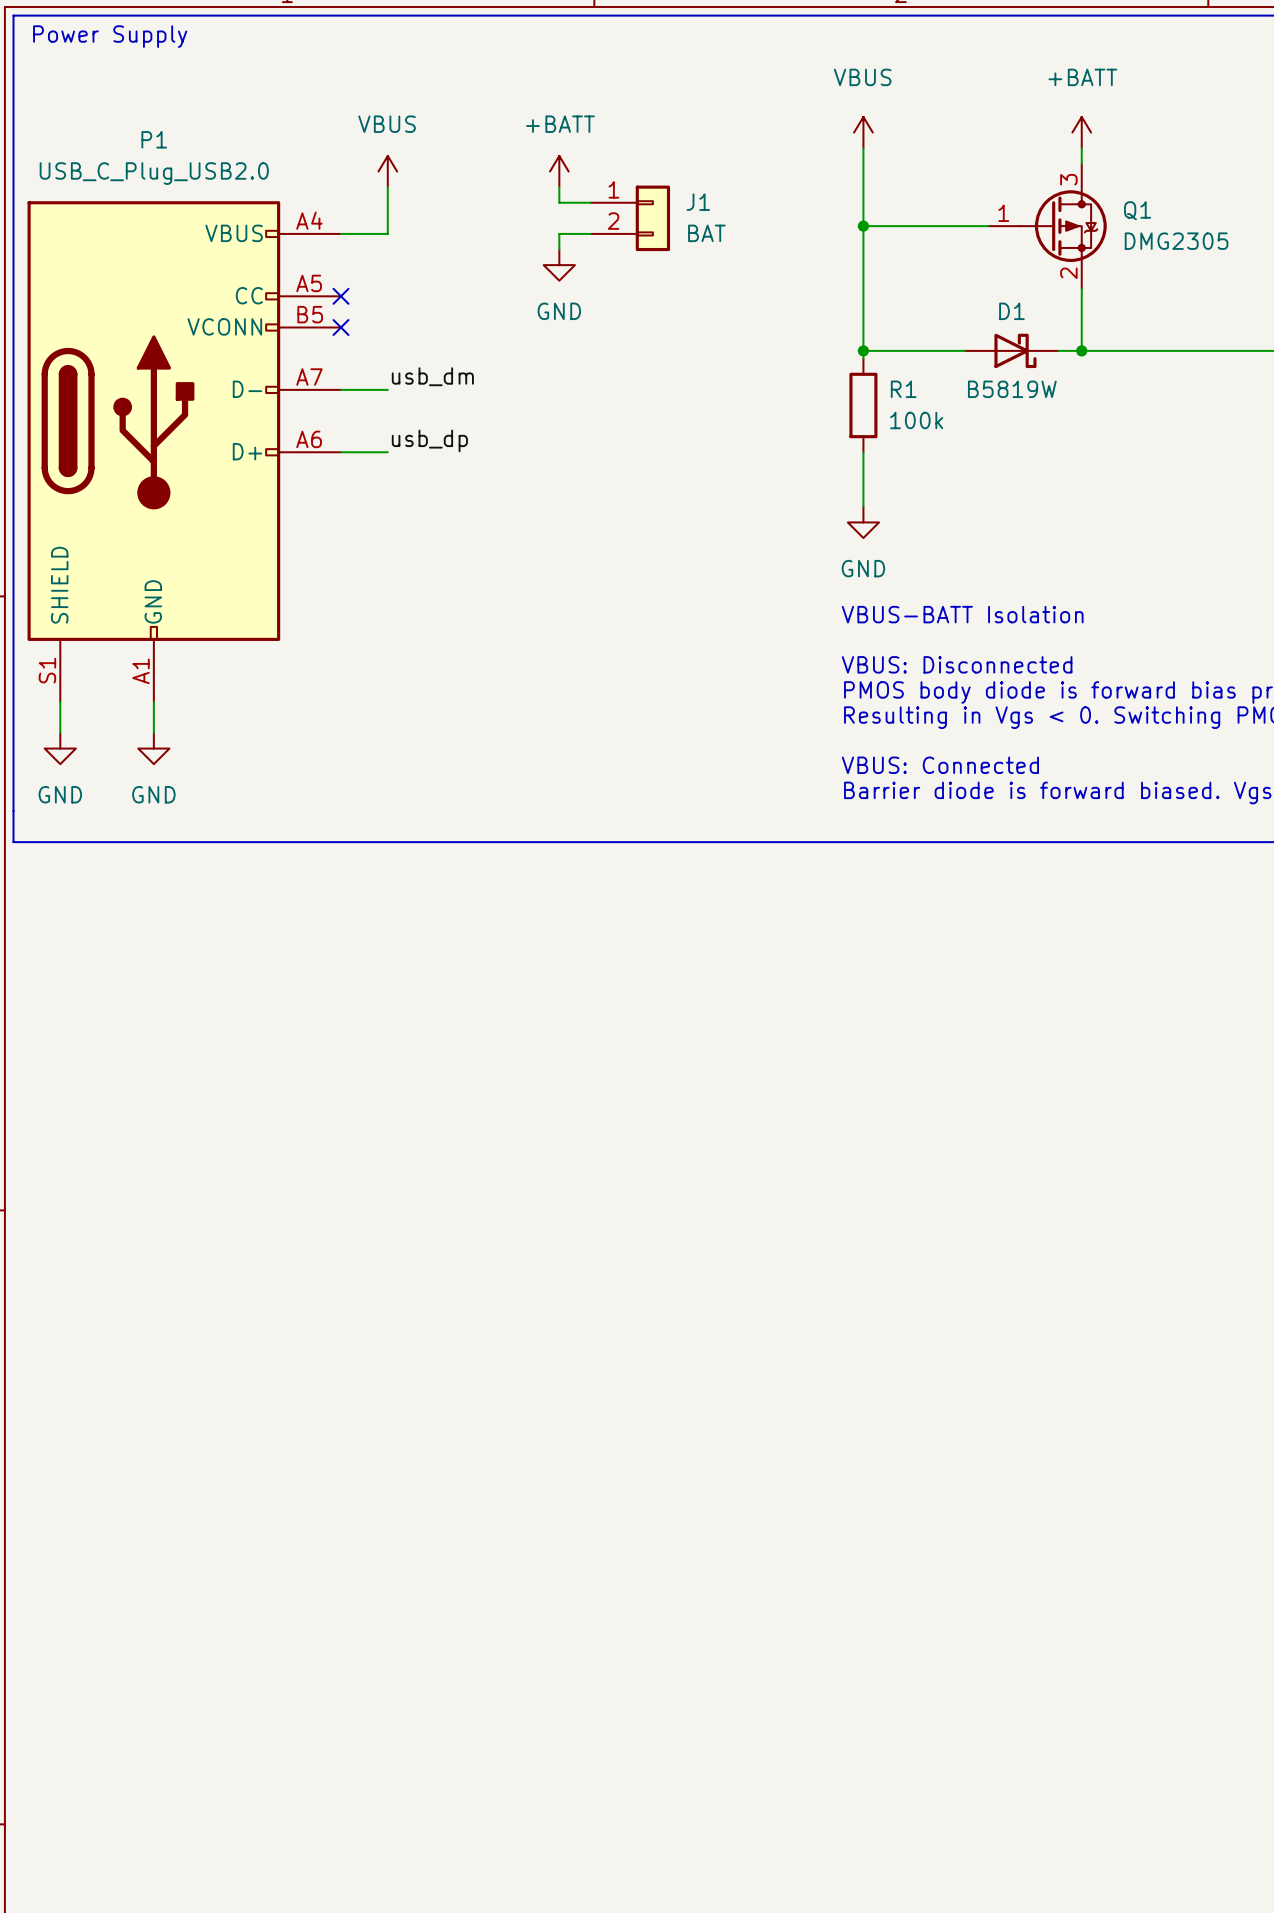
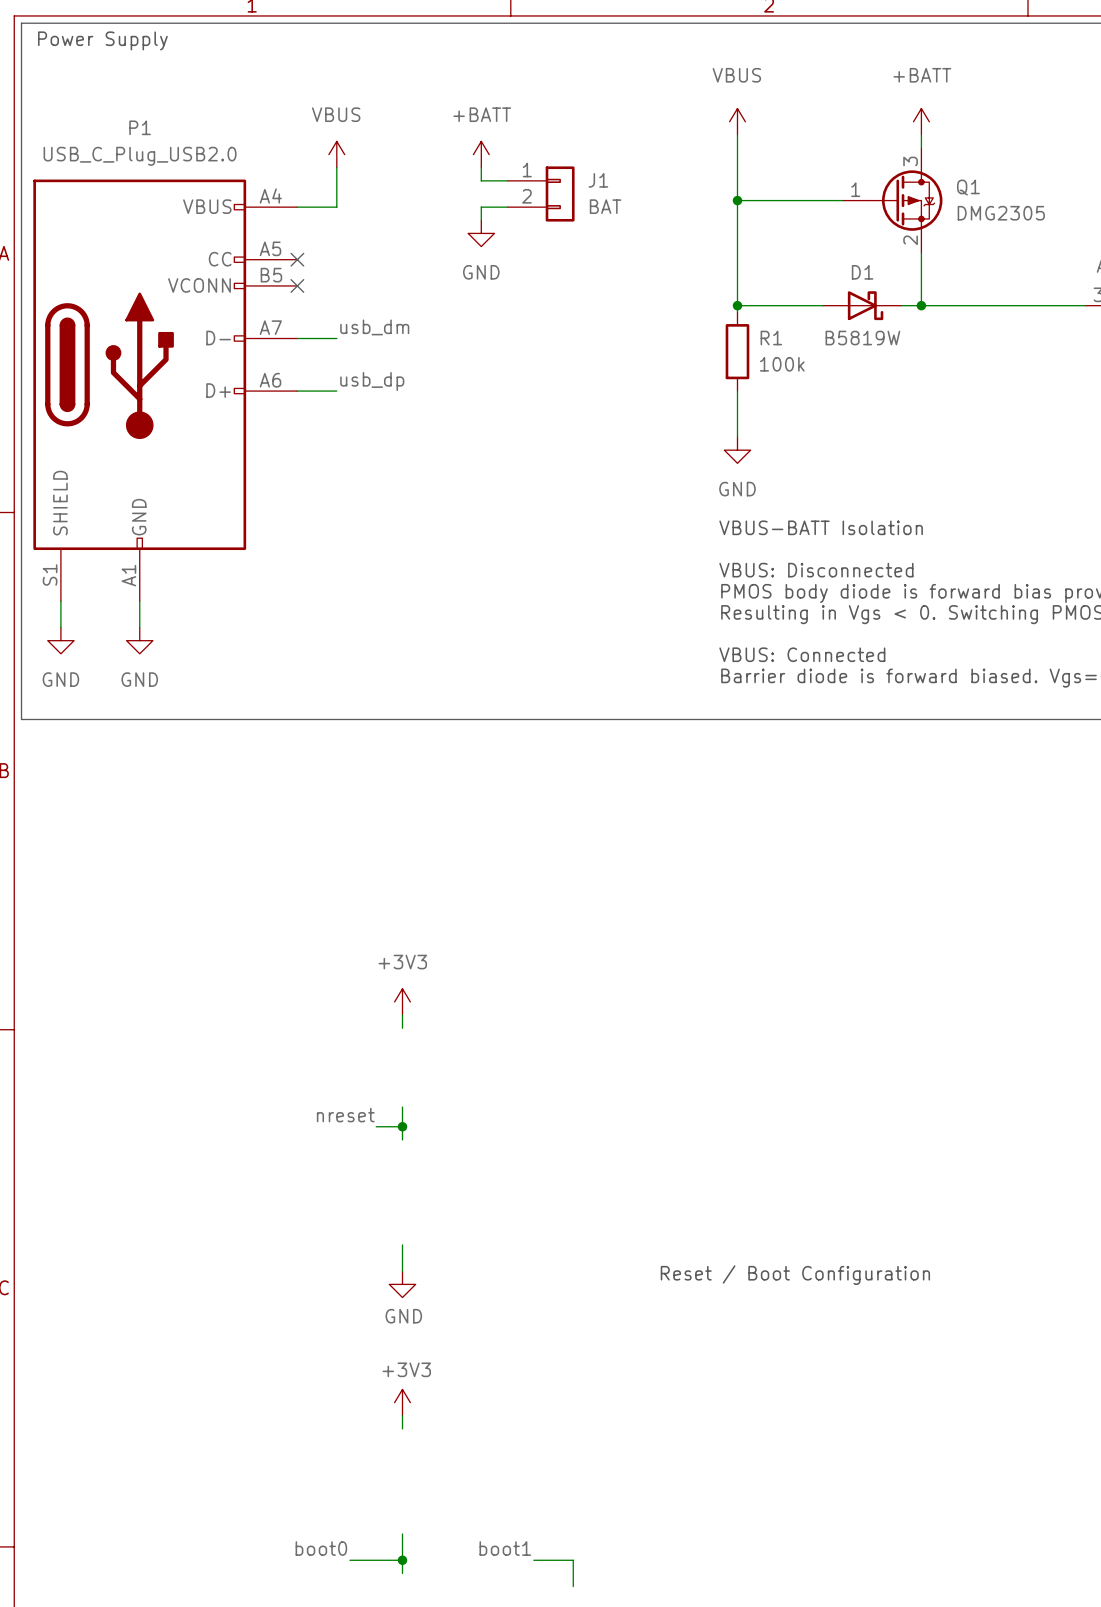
power symbol: none -> +3V3 (402, 1001)
wire: none -> (402, 1015) (402, 1028)
wire: none -> (402, 1107) (402, 1139)
label: none -> nreset (345, 1115)
wire: none -> (376, 1126) (402, 1126)
junction: none -> (402, 1126)
wire: none -> (402, 1244) (402, 1271)
text: none -> Reset / Boot Configuration (795, 1275)
power symbol: none -> GND (402, 1284)
power symbol: none -> +3V3 (402, 1402)
wire: none -> (402, 1415) (402, 1428)
wire: none -> (402, 1534) (402, 1573)
label: none -> boot0 (321, 1548)
label: none -> boot1 (505, 1548)
wire: none -> (349, 1560) (402, 1560)
junction: none -> (402, 1560)
wire: none -> (533, 1560) (573, 1560) (573, 1586)

